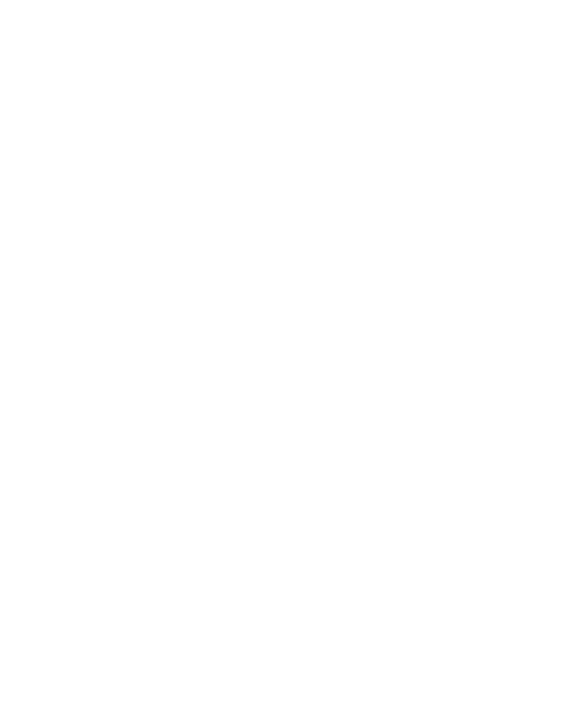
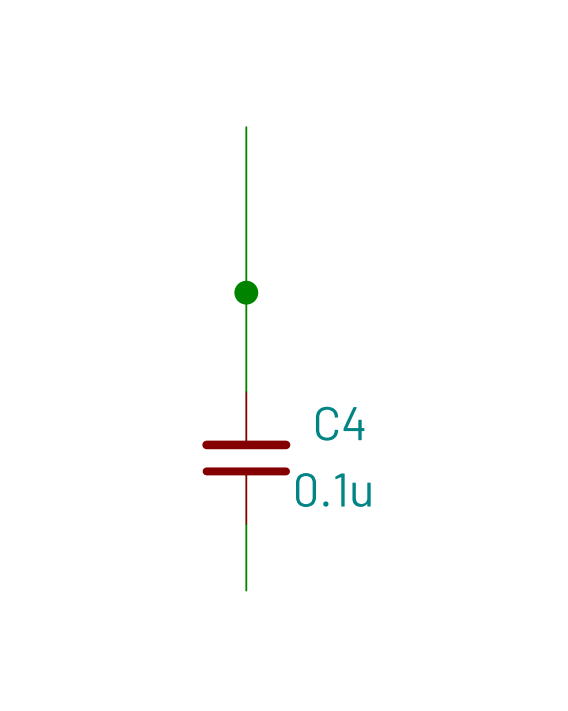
wire: none -> (246, 127) (246, 391)
junction: none -> (246, 292)
C4: none -> 0.1u (246, 458)
wire: none -> (246, 524) (246, 590)

